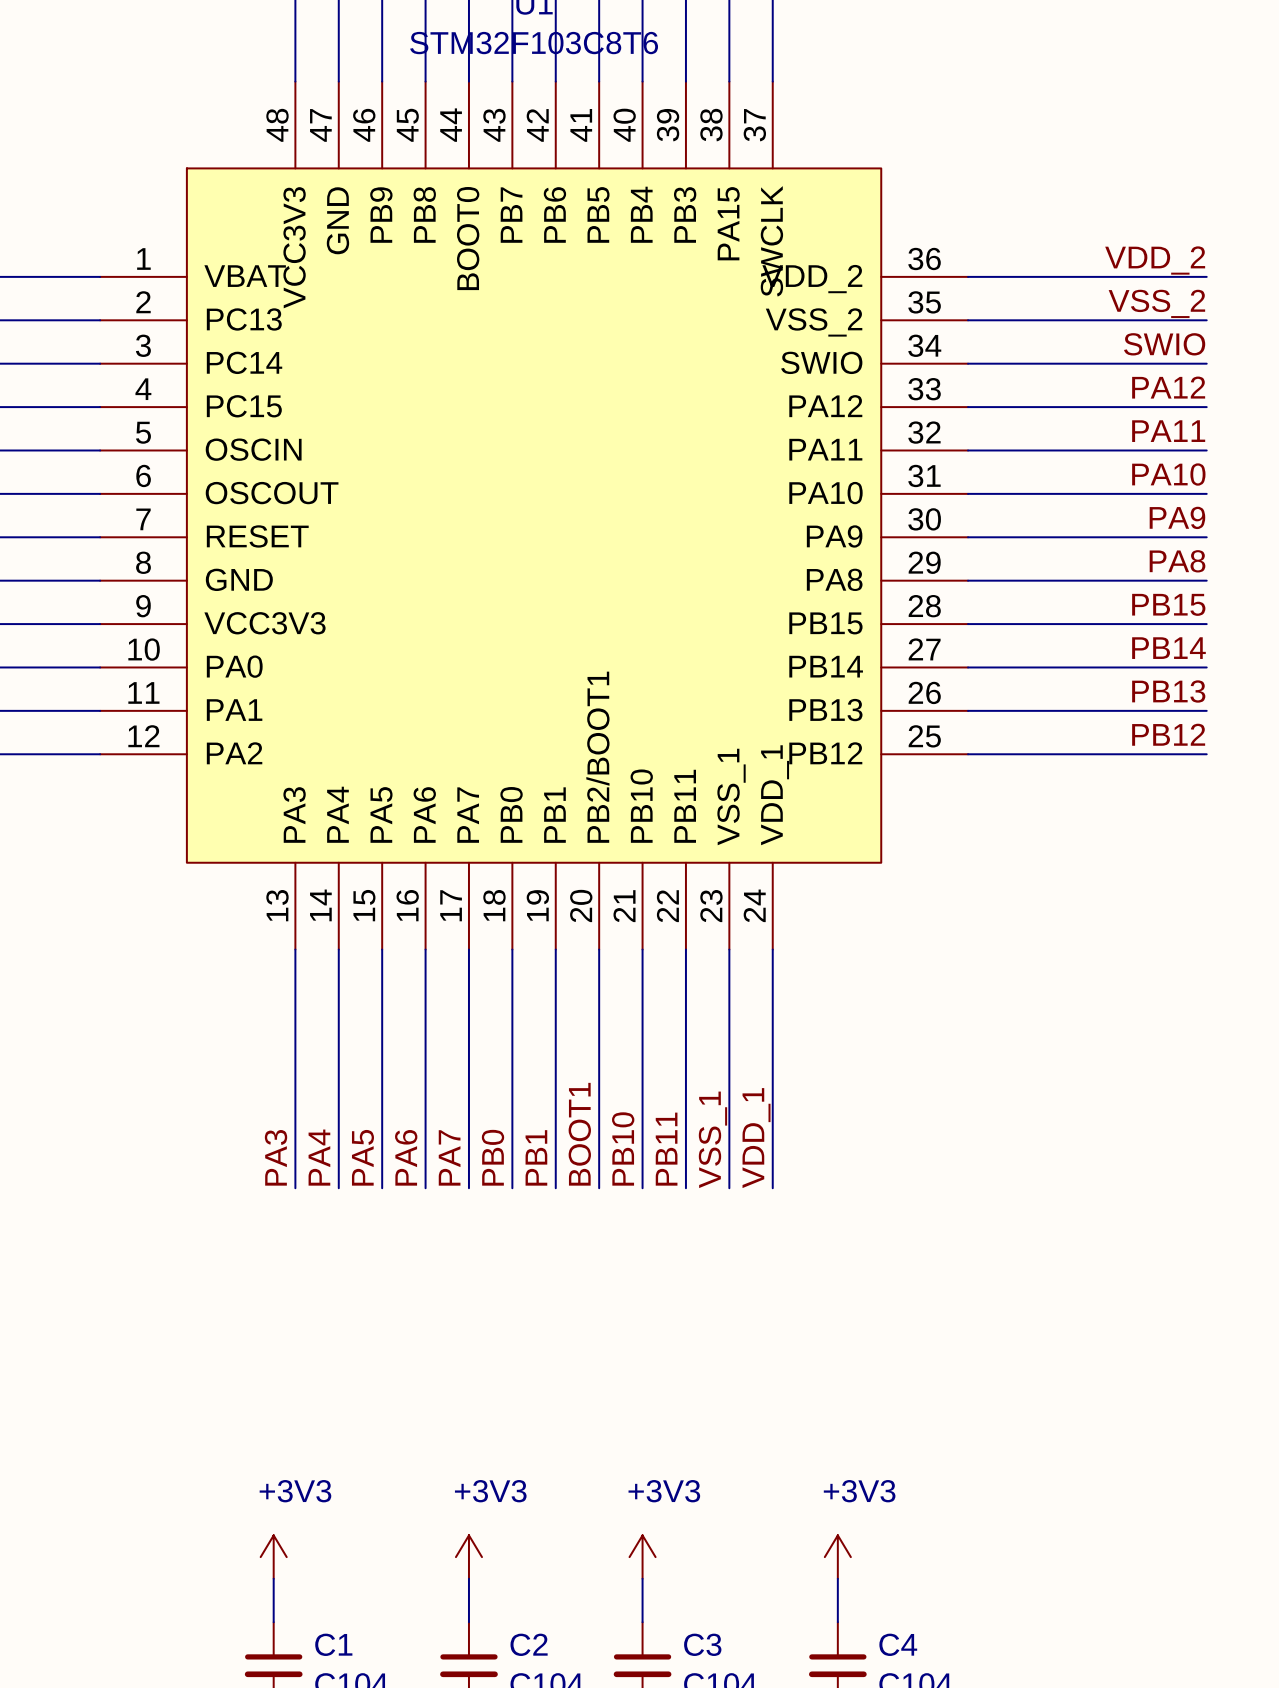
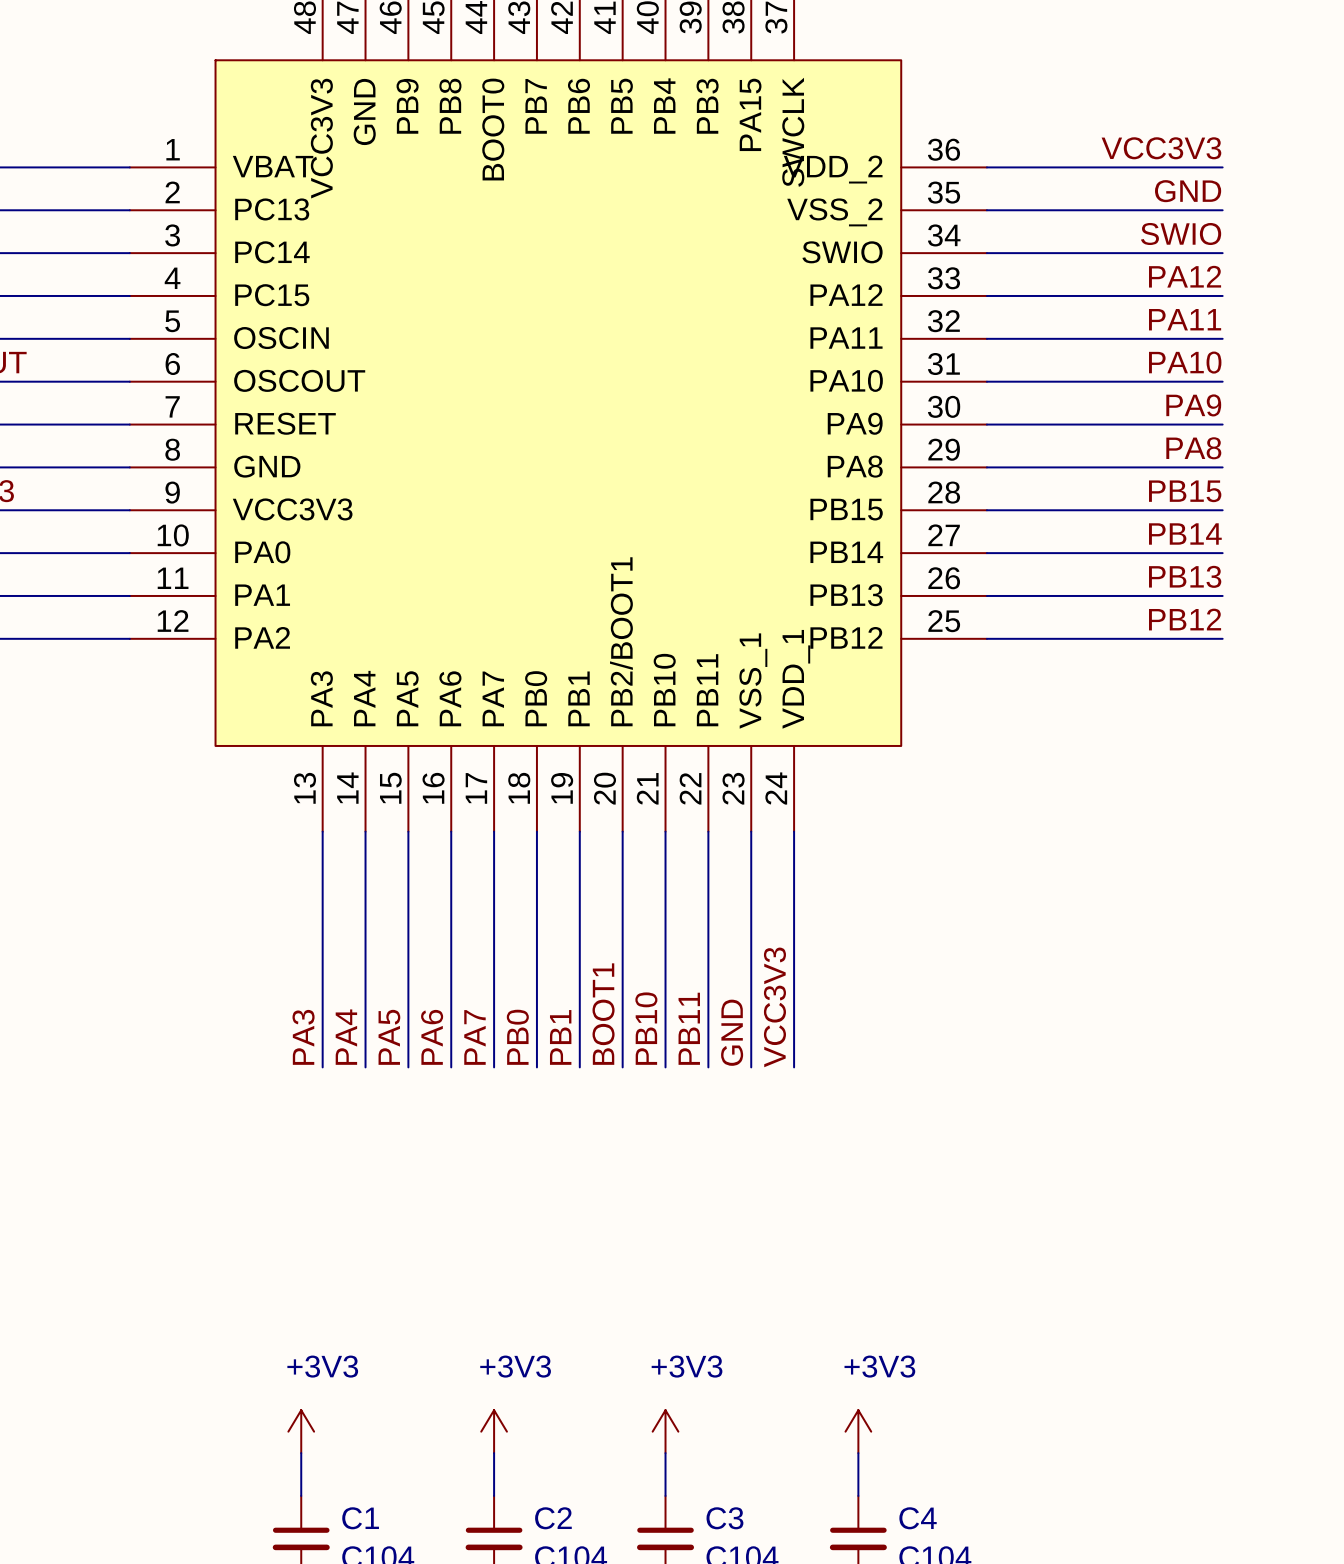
label: VDD_2 (1155, 260) -> VCC3V3 (1161, 148)
label: VSS_2 (1156, 303) -> GND (1188, 191)
label: VDD_1 (756, 1138) -> VCC3V3 (774, 1007)
label: VSS_1 (712, 1139) -> GND (732, 1032)

